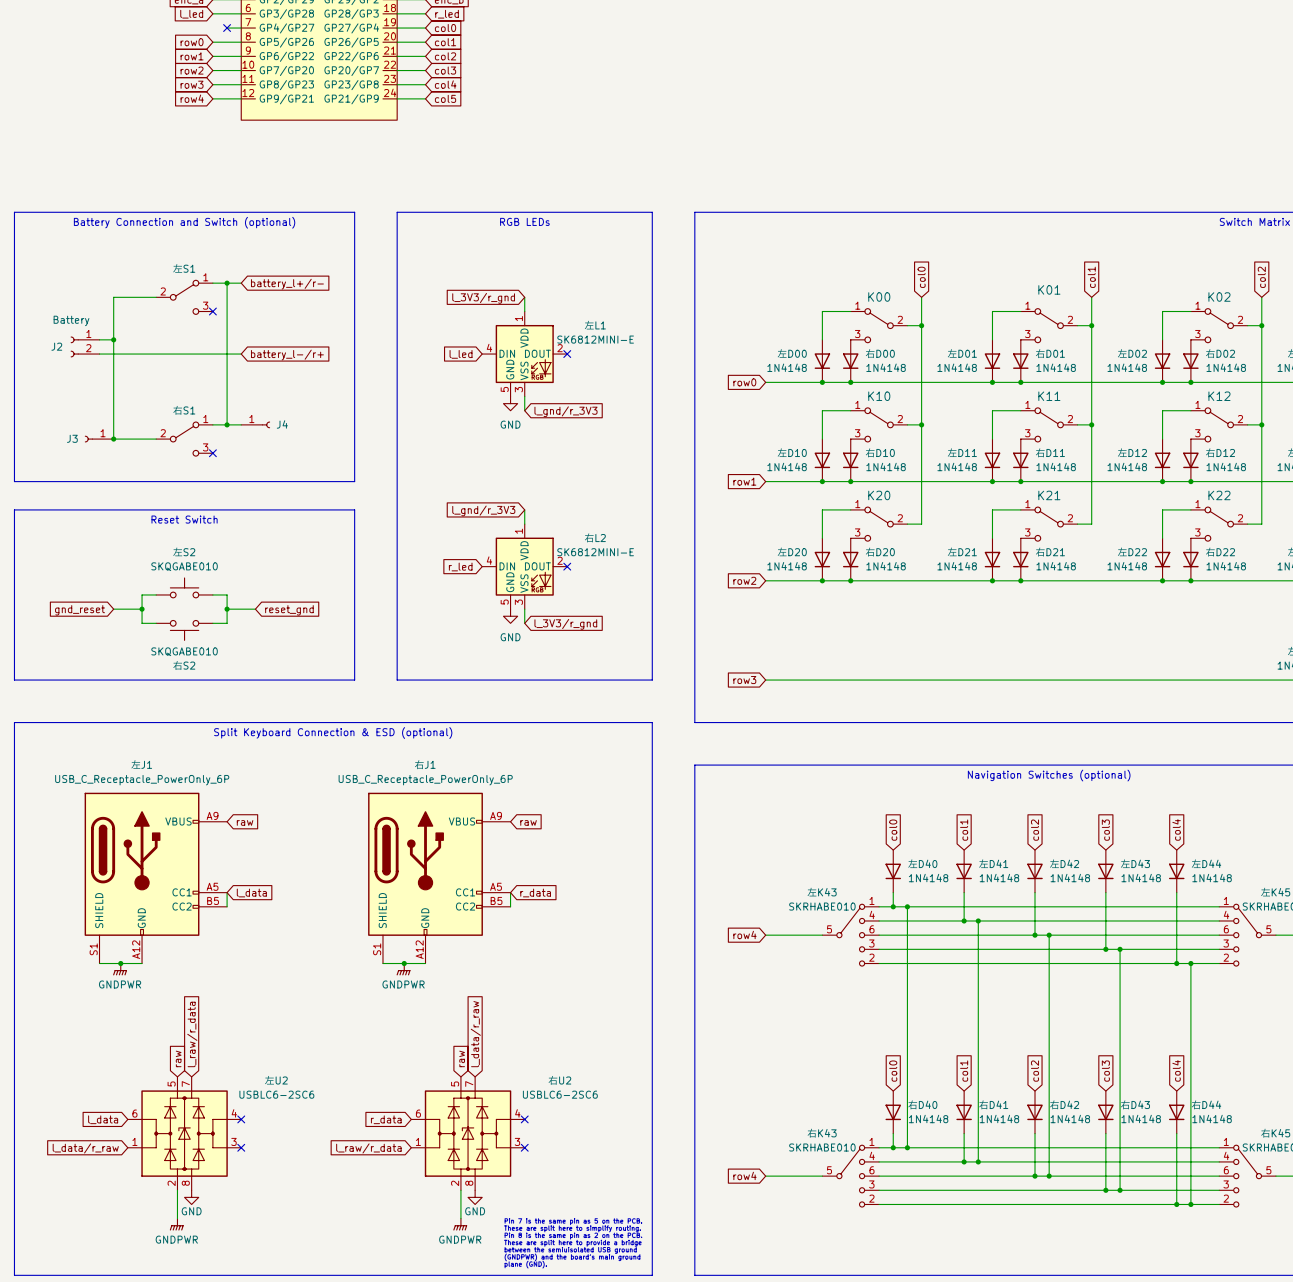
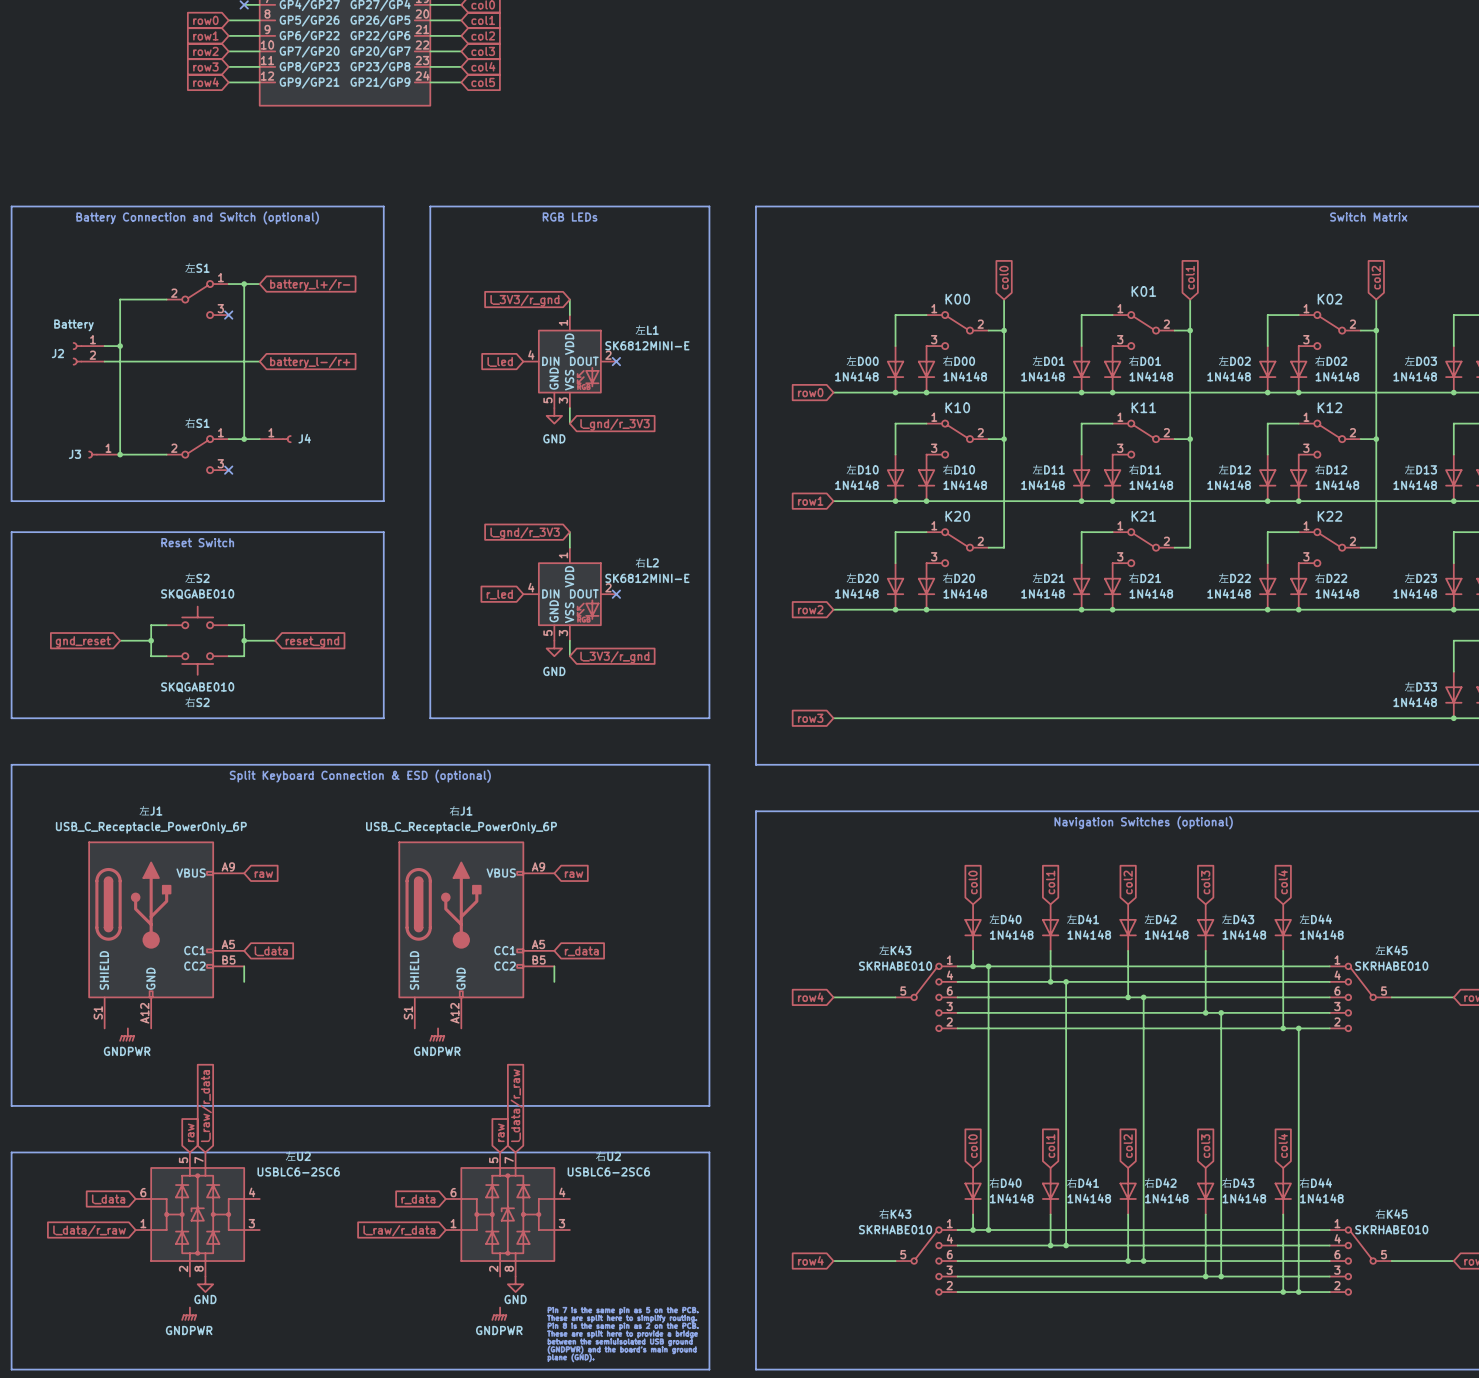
wire: (227, 892) (227, 906) -> (244, 981) (244, 966)
wire: (510, 892) (510, 906) -> (554, 981) (554, 966)
wire: (99, 963) (142, 963) -> none
junction: (120, 963) -> none
wire: (382, 963) (425, 963) -> none
junction: (404, 963) -> none
line: (14, 1034) (14, 1076) -> (11, 1105) (709, 1105)
line: (652, 1034) (652, 1076) -> (11, 1152) (709, 1152)
no-connect mark: (241, 1119) -> none
no-connect mark: (524, 1119) -> none
no-connect mark: (241, 1147) -> none
no-connect mark: (524, 1147) -> none
wire: (177, 1190) (177, 1218) -> none
wire: (460, 1190) (460, 1218) -> none

